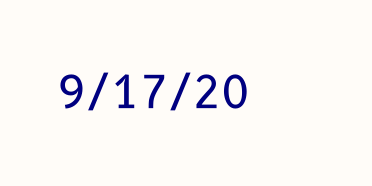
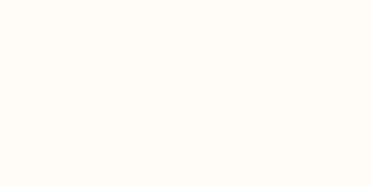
text: 9/17/20 (153, 91) -> none

